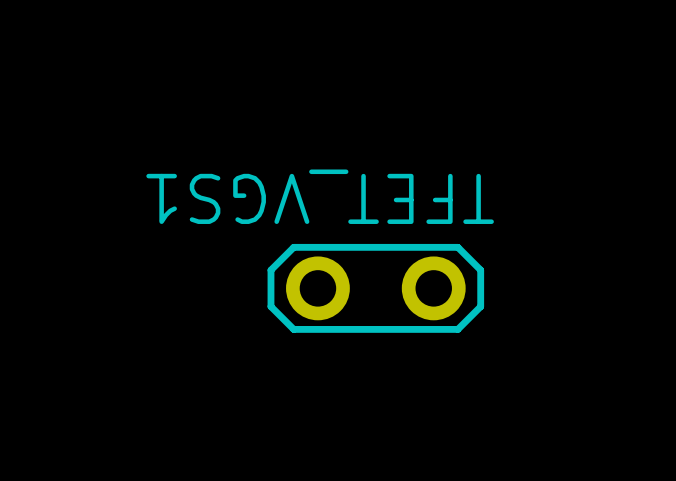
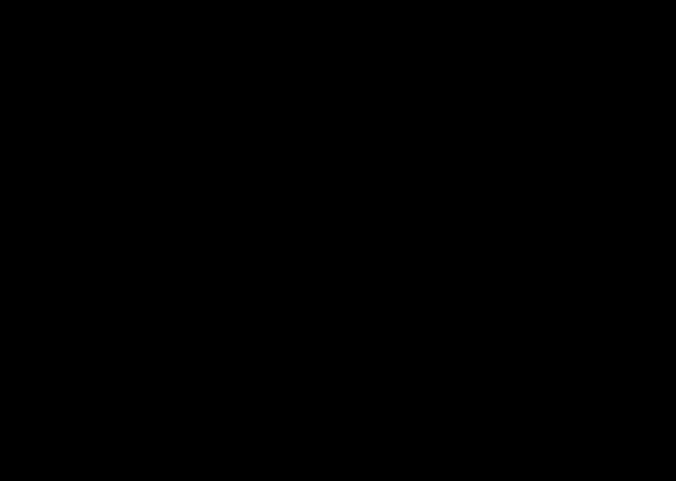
TFET_VGS1: (375, 288) -> none

